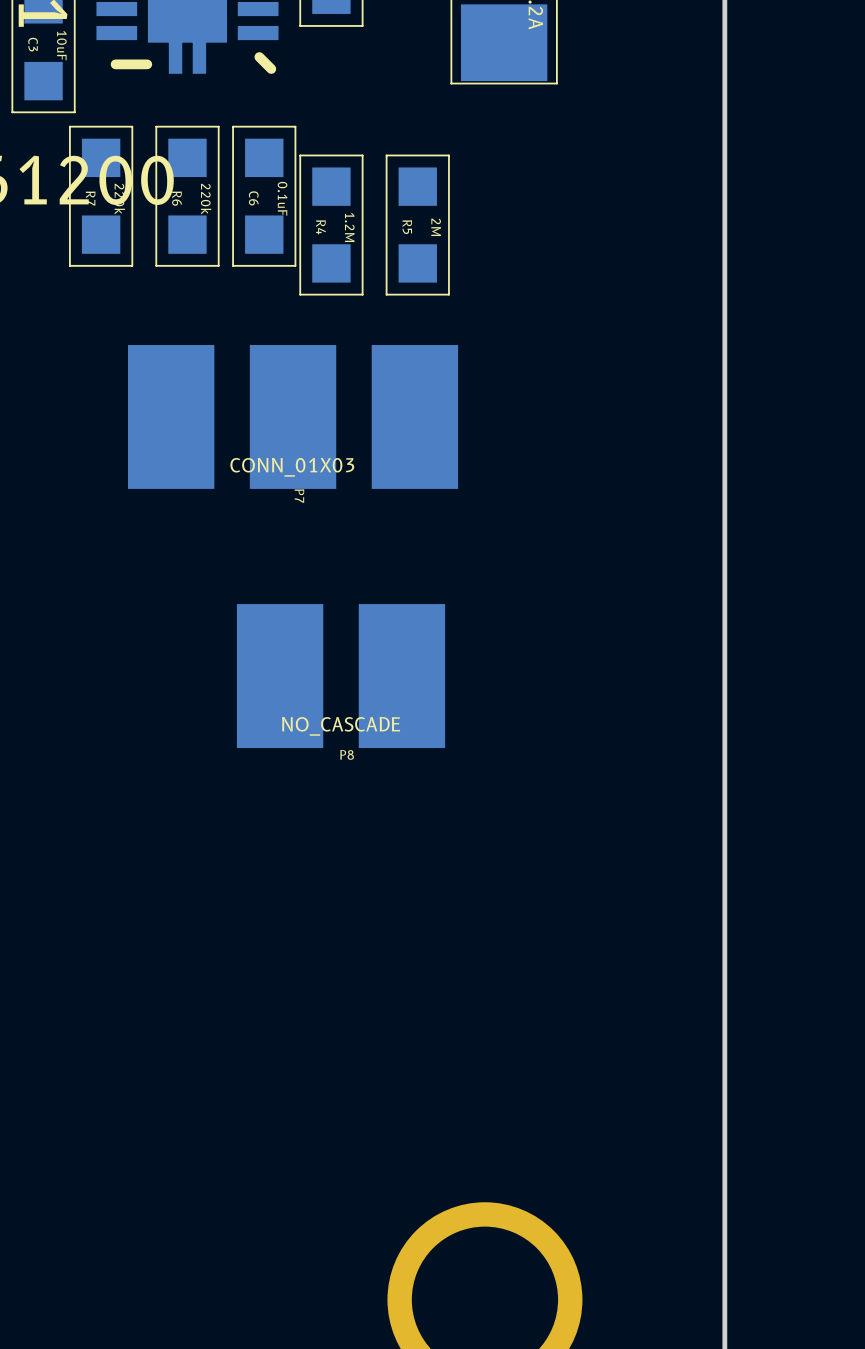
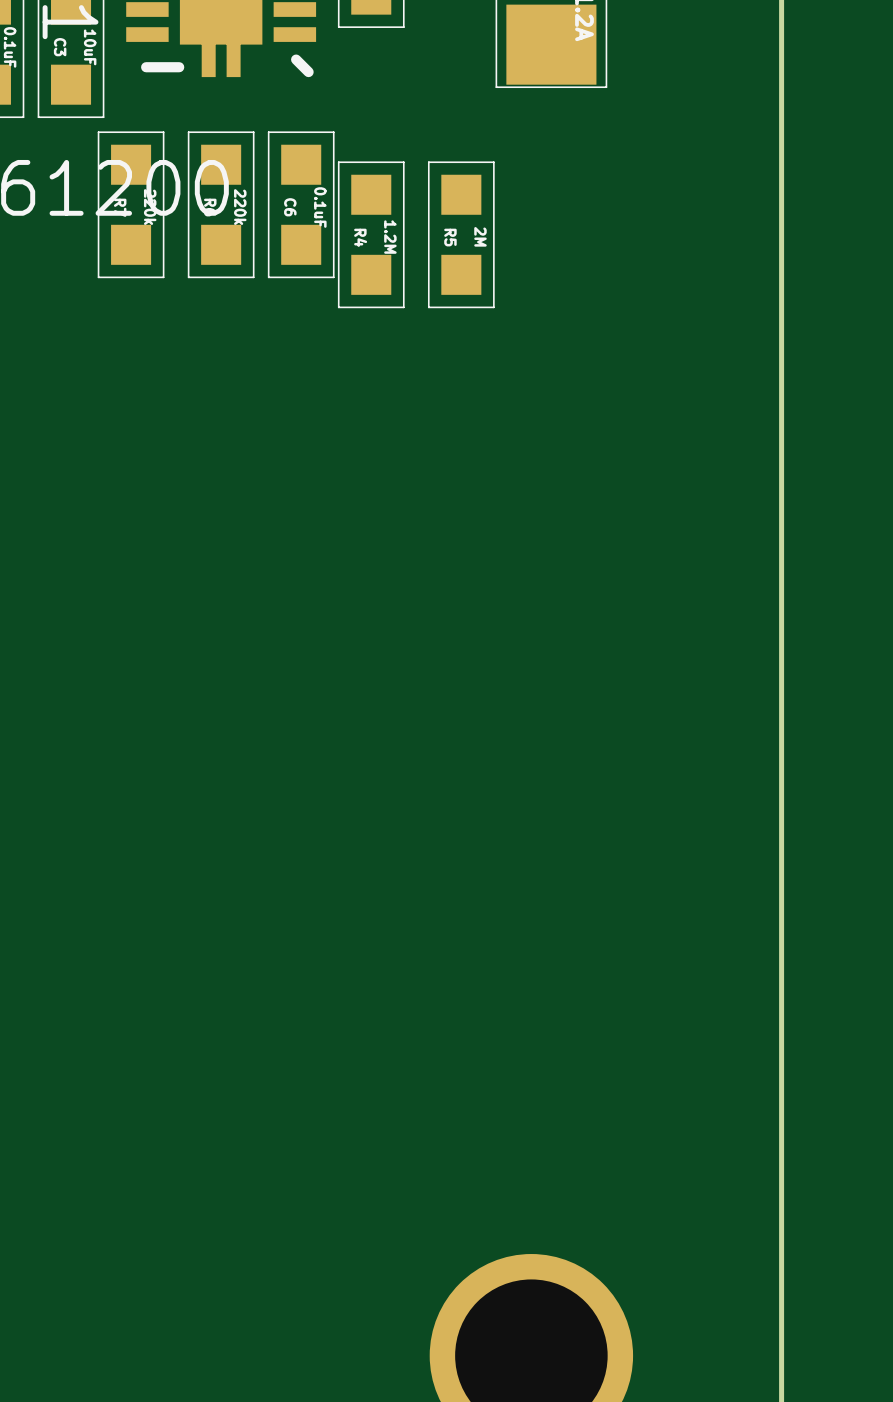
P7: CONN_01X03 (293, 416) -> none
P8: NO_CASCADE (341, 676) -> none

